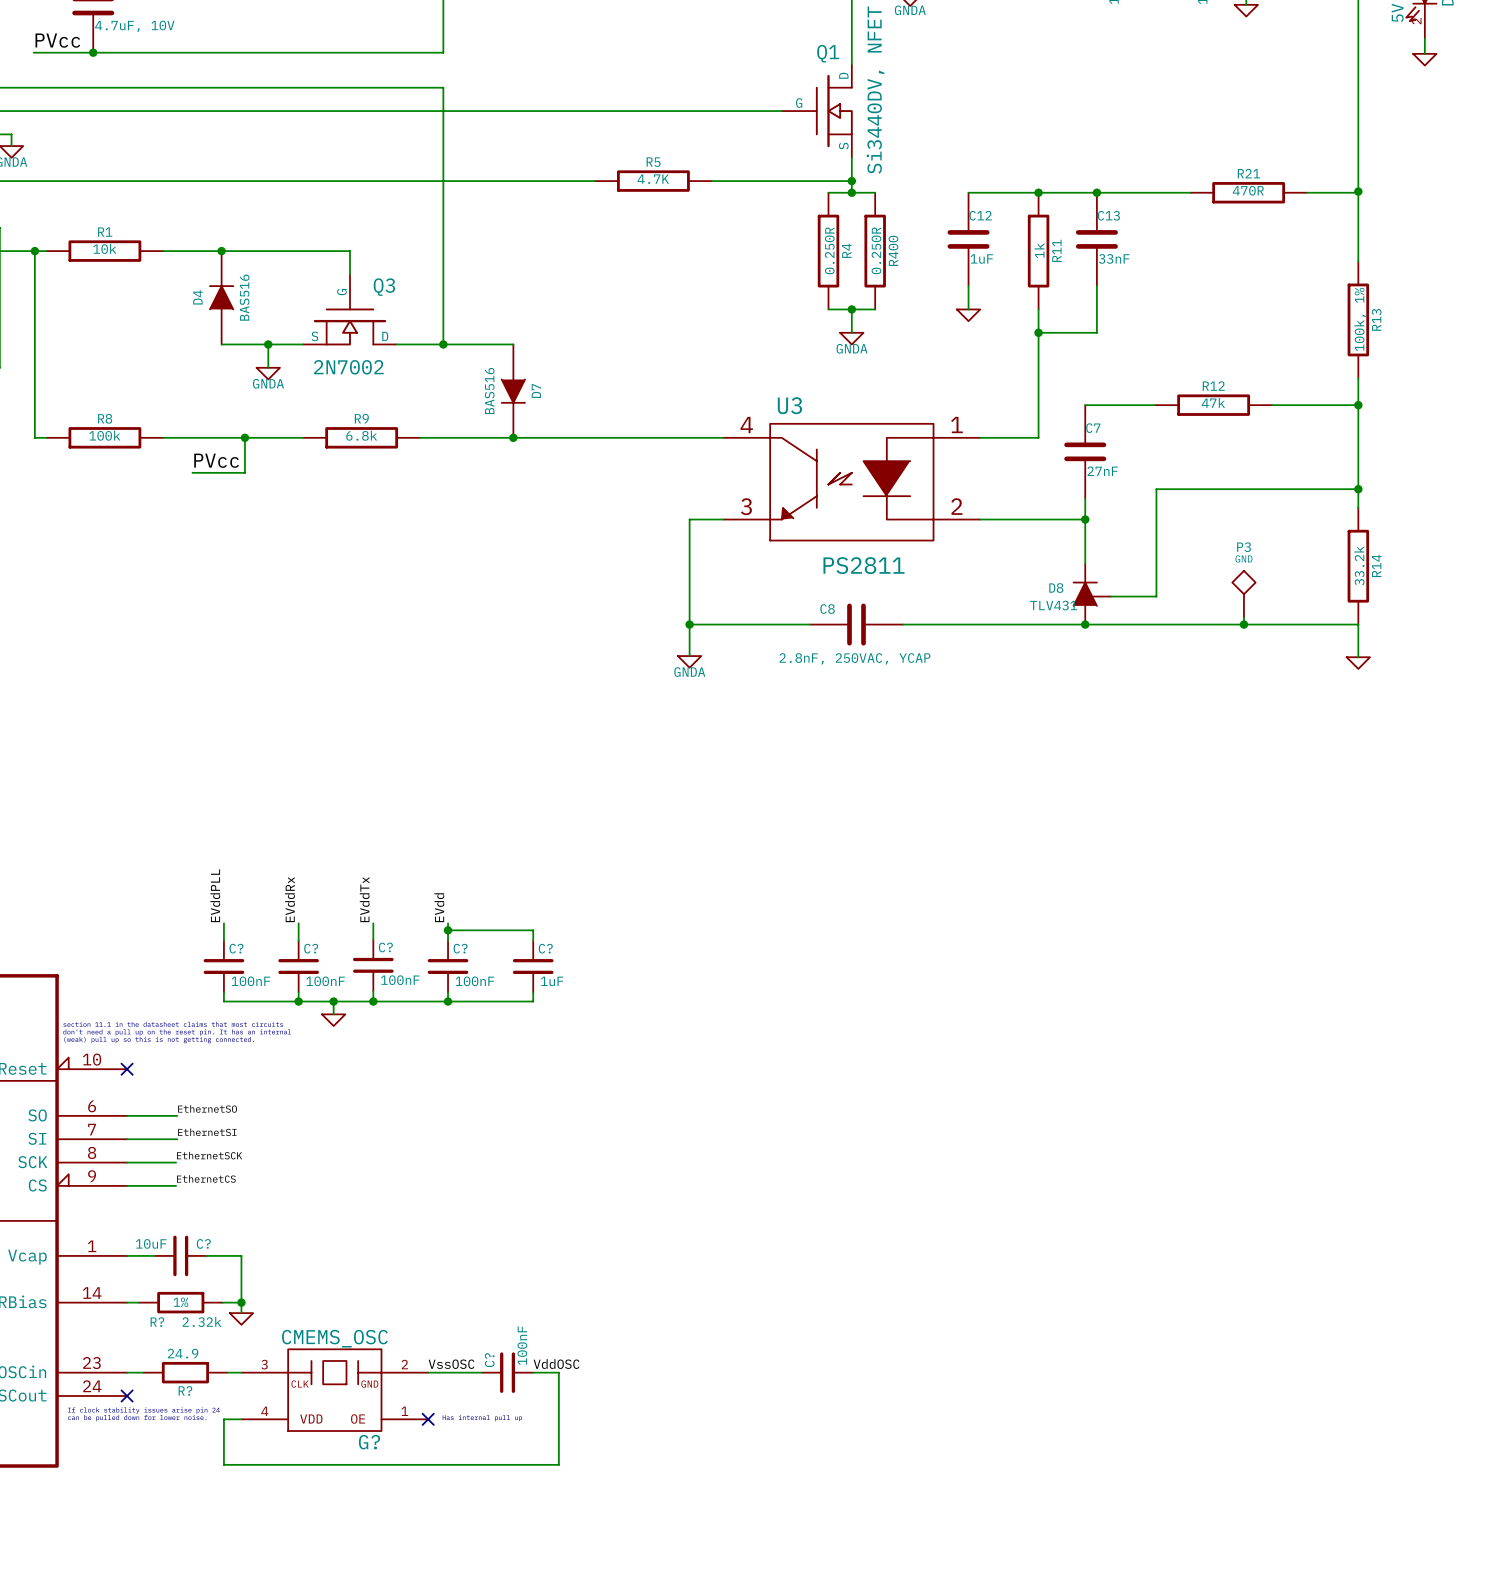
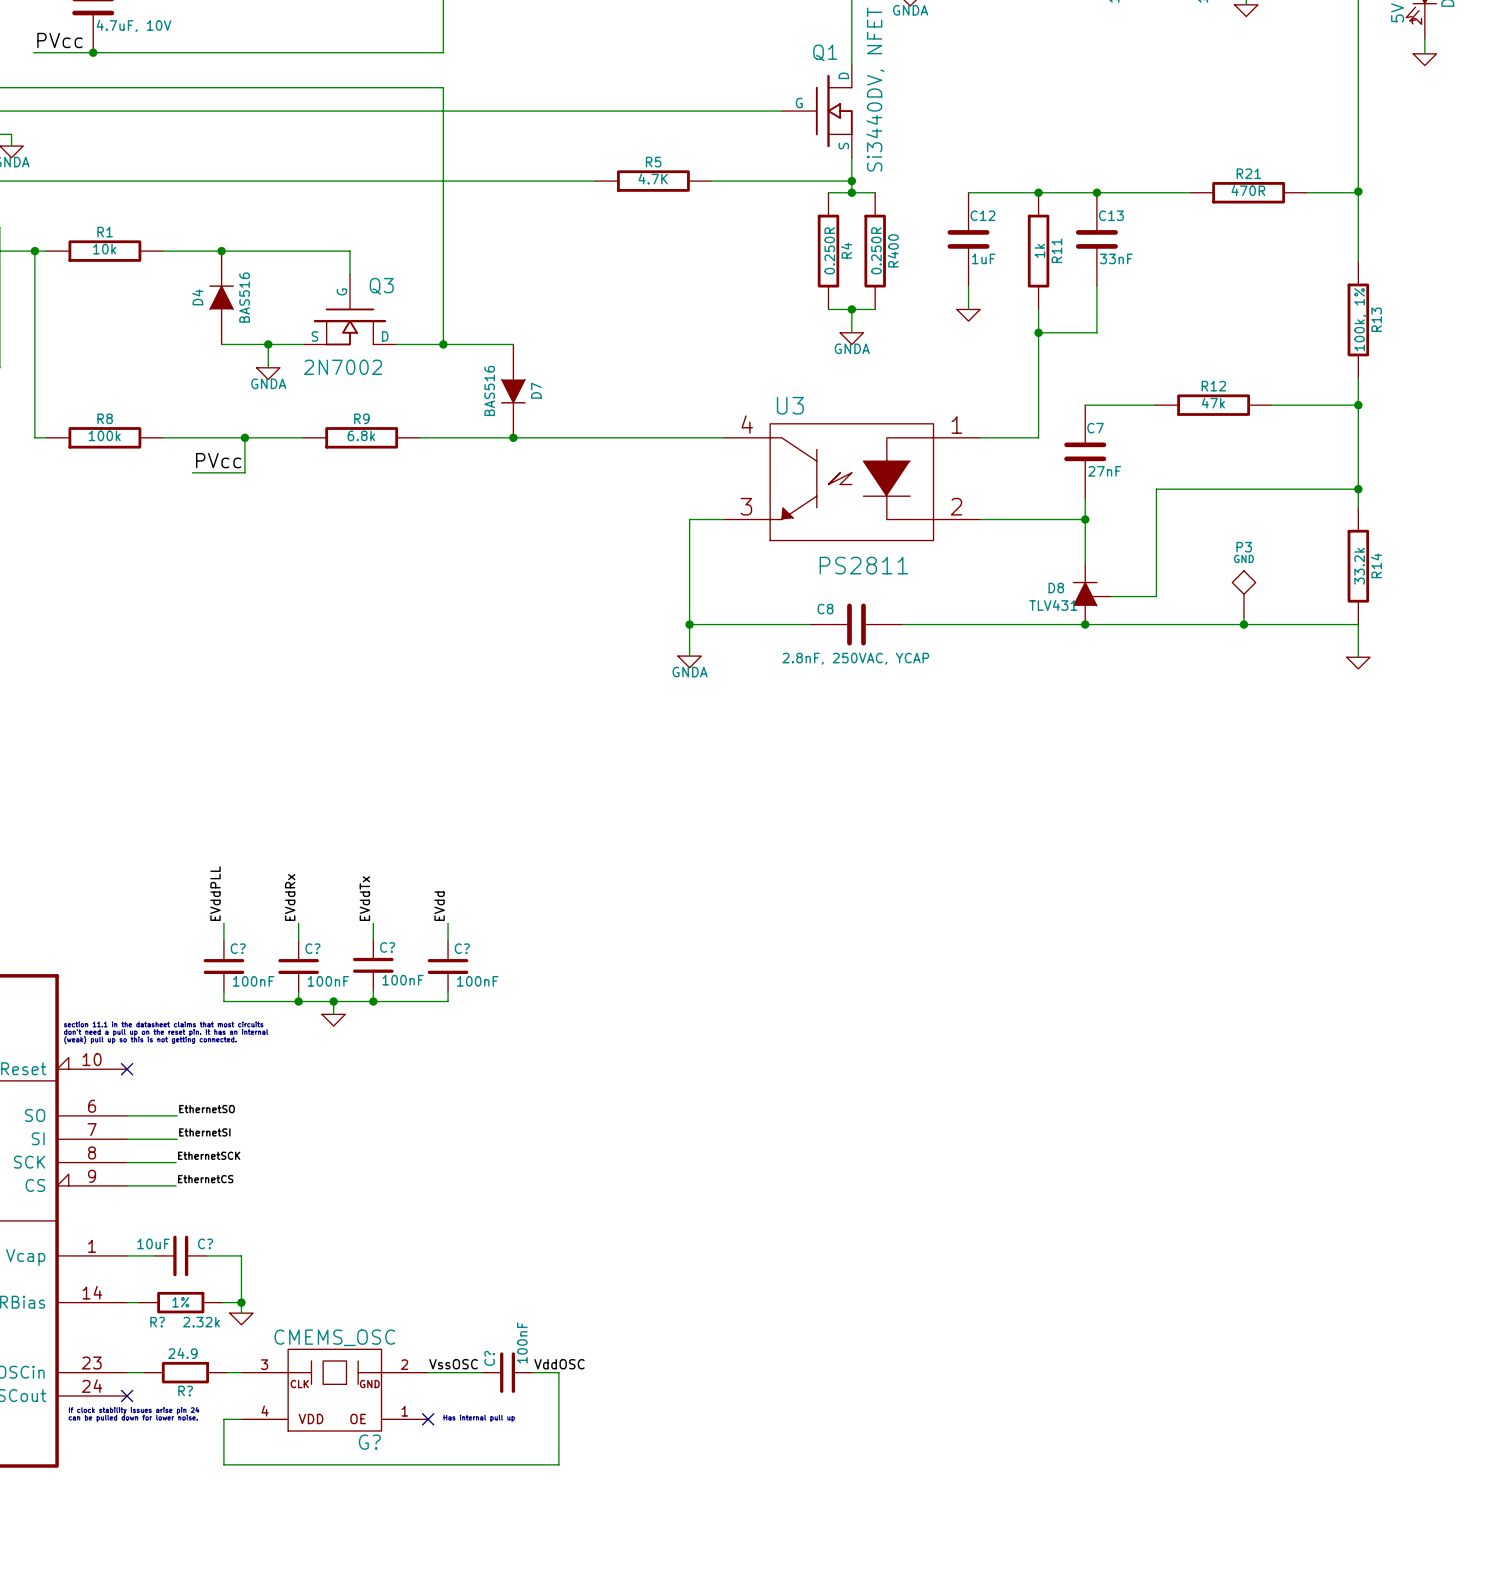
wire: (448, 930) (533, 930) (533, 940) -> none
junction: (448, 930) -> none
C?: 1uF (533, 966) -> none
wire: (533, 992) (533, 1001) (448, 1001) -> none
junction: (448, 1001) -> none

